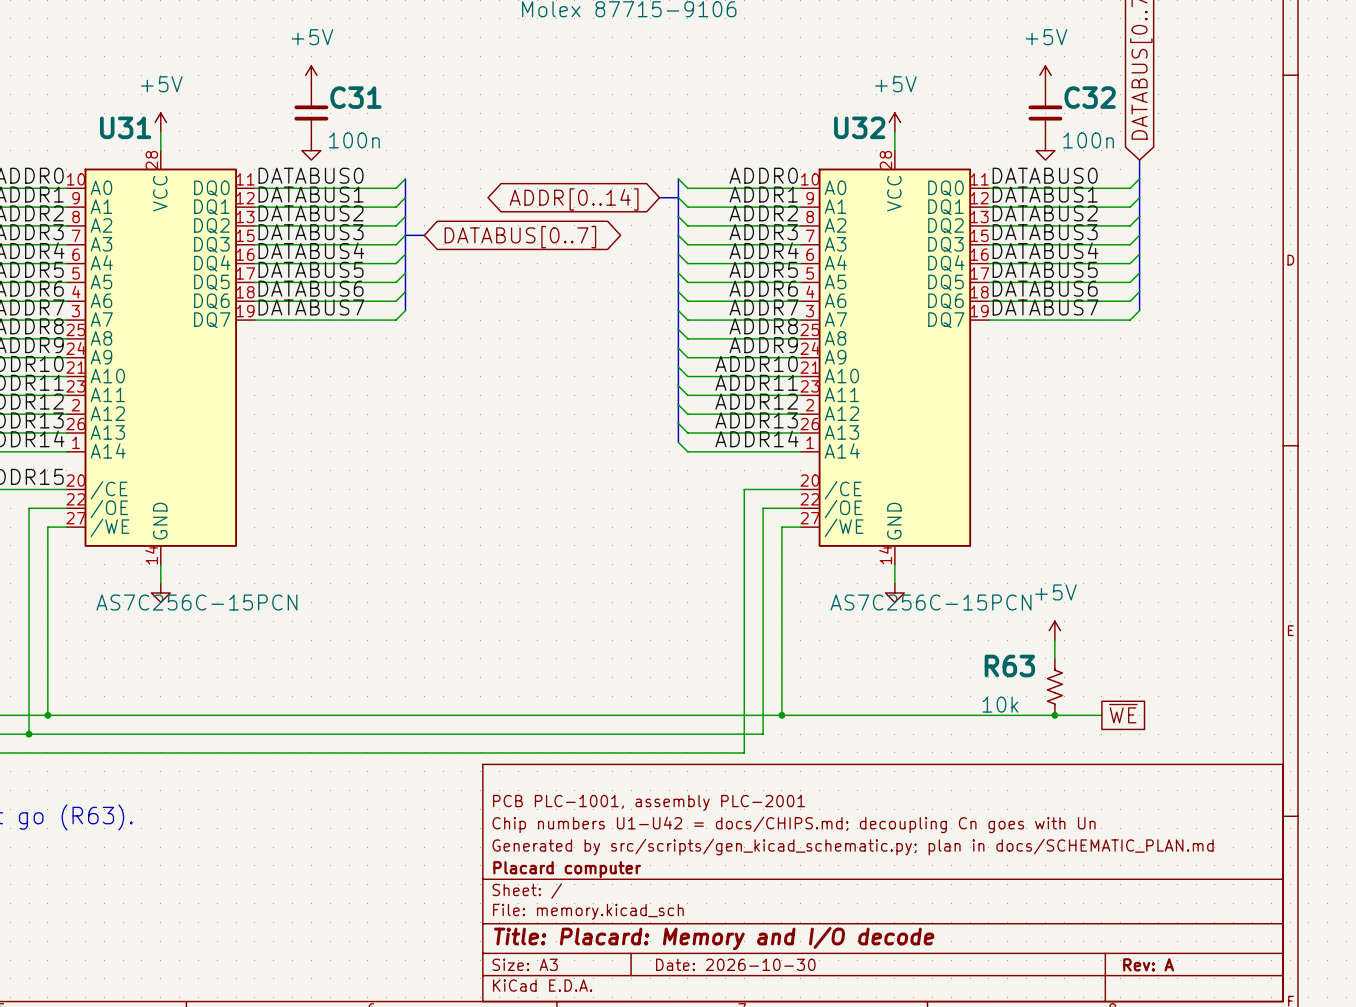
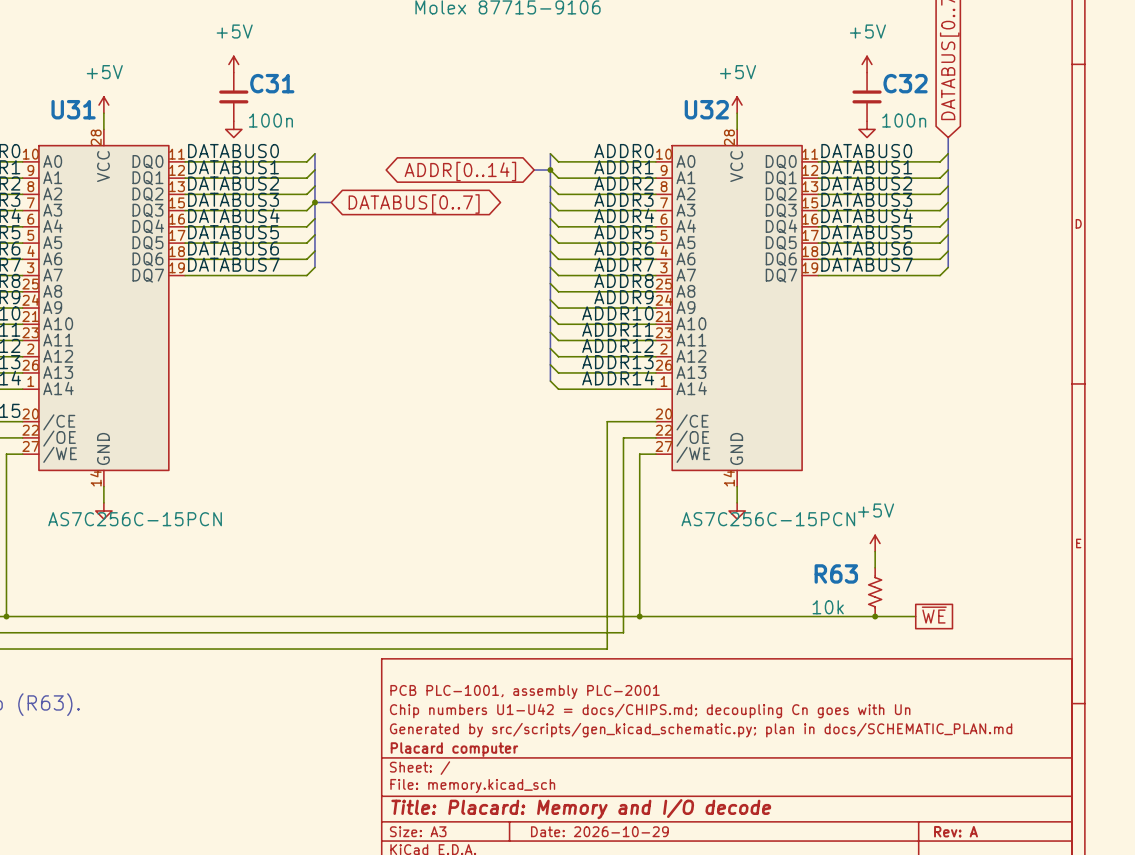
junction: none -> (550, 170)
junction: none -> (314, 202)
title block: Date: 2026-10-30 (735, 964) -> Date: 2026-10-29 (599, 831)

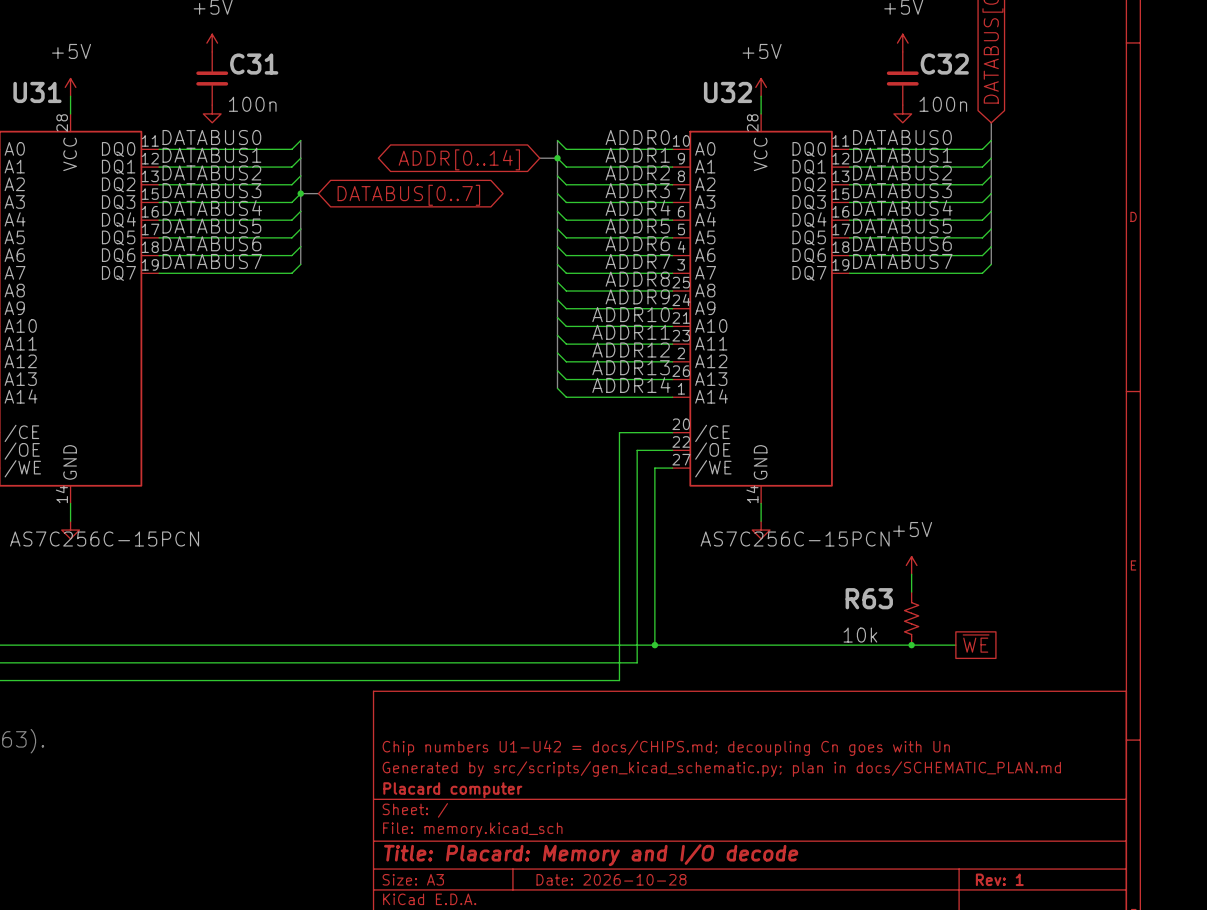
title block: PCB PLC-1001, assembly PLC-2001 (525, 692) -> none
title block: Date: 2026-10-29 (599, 831) -> Date: 2026-10-28 (611, 879)
title block: Rev: A (956, 831) -> Rev: 1 (999, 879)

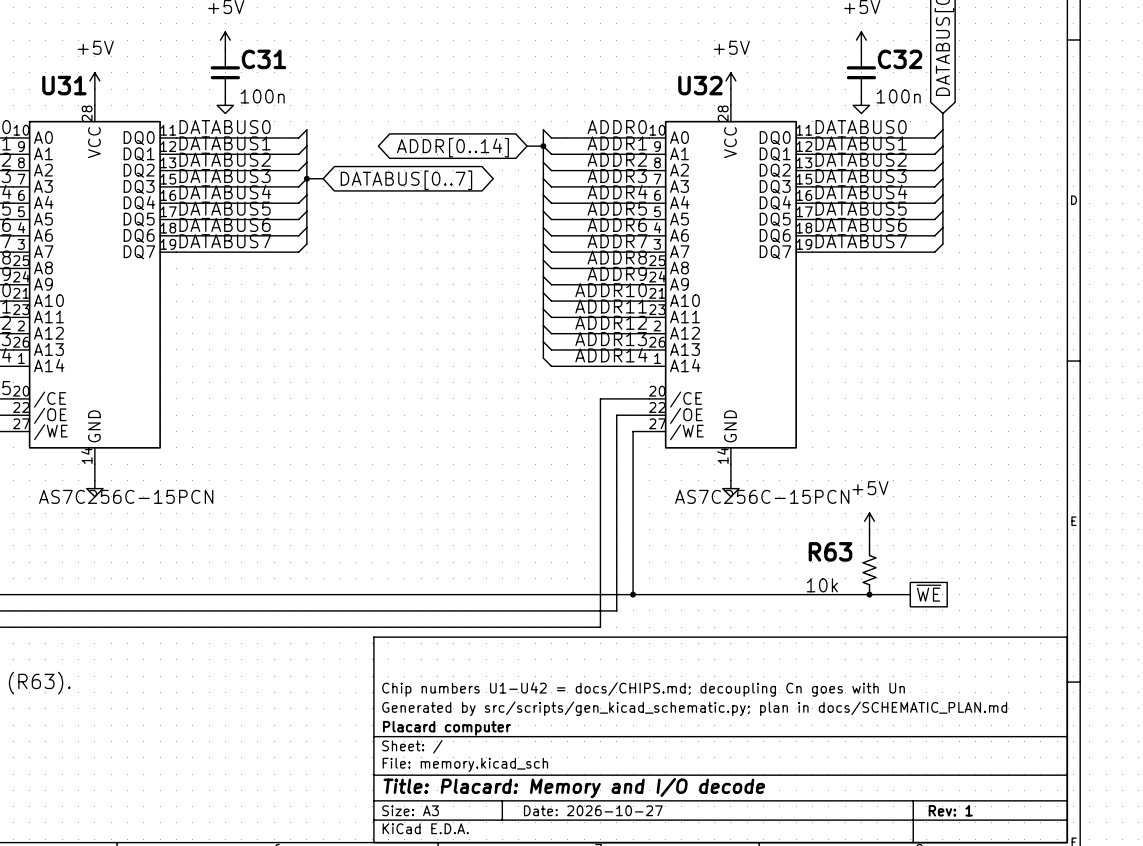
title block: Date: 2026-10-28 (611, 879) -> Date: 2026-10-27 (593, 810)

